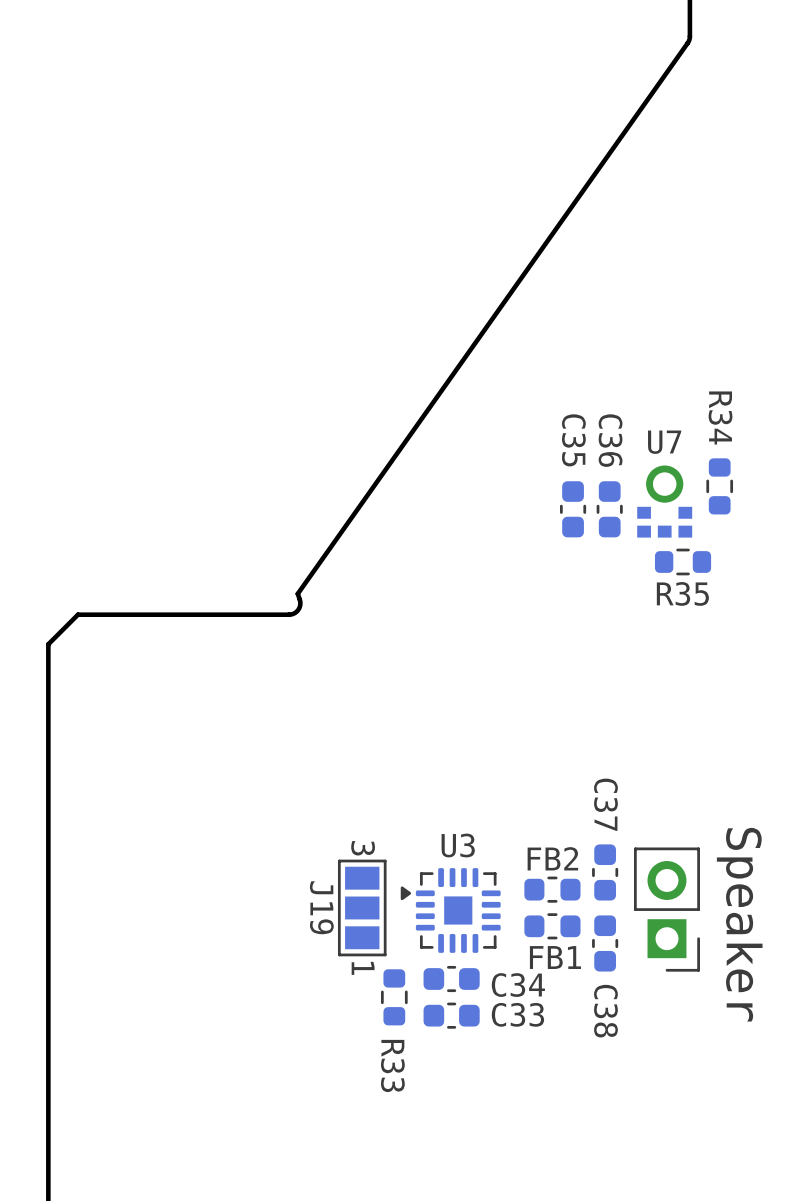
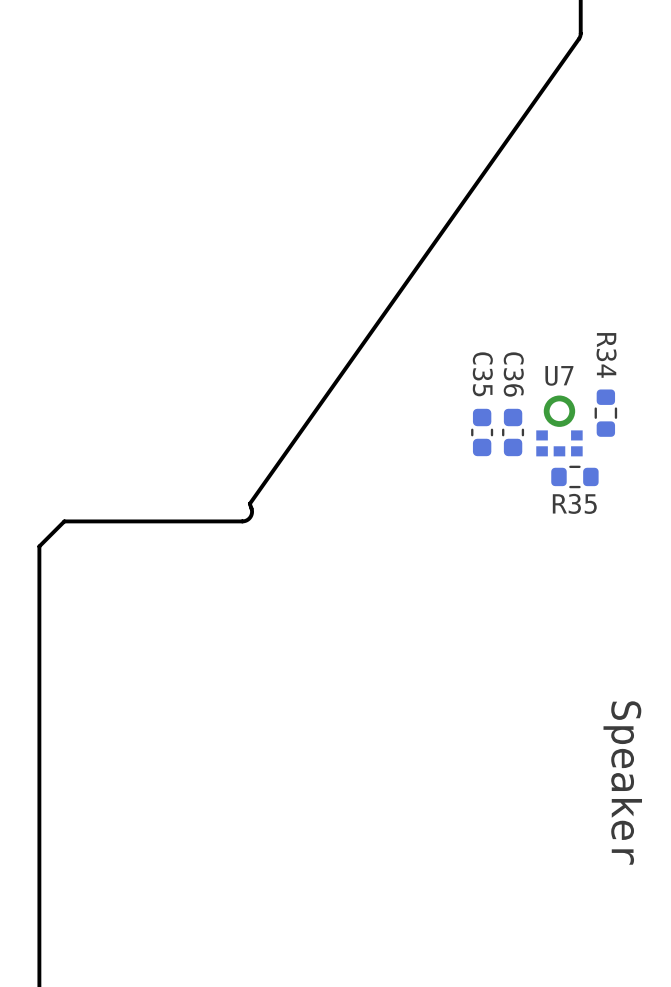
C37: (605, 872) -> none
FB2: (552, 889) -> none
J19: (362, 907) -> none
part: (666, 909) -> none
U3: (450, 910) -> none
FB1: (552, 926) -> none
C38: (605, 943) -> none
C34: (451, 979) -> none
R33: (394, 997) -> none
C33: (451, 1015) -> none

